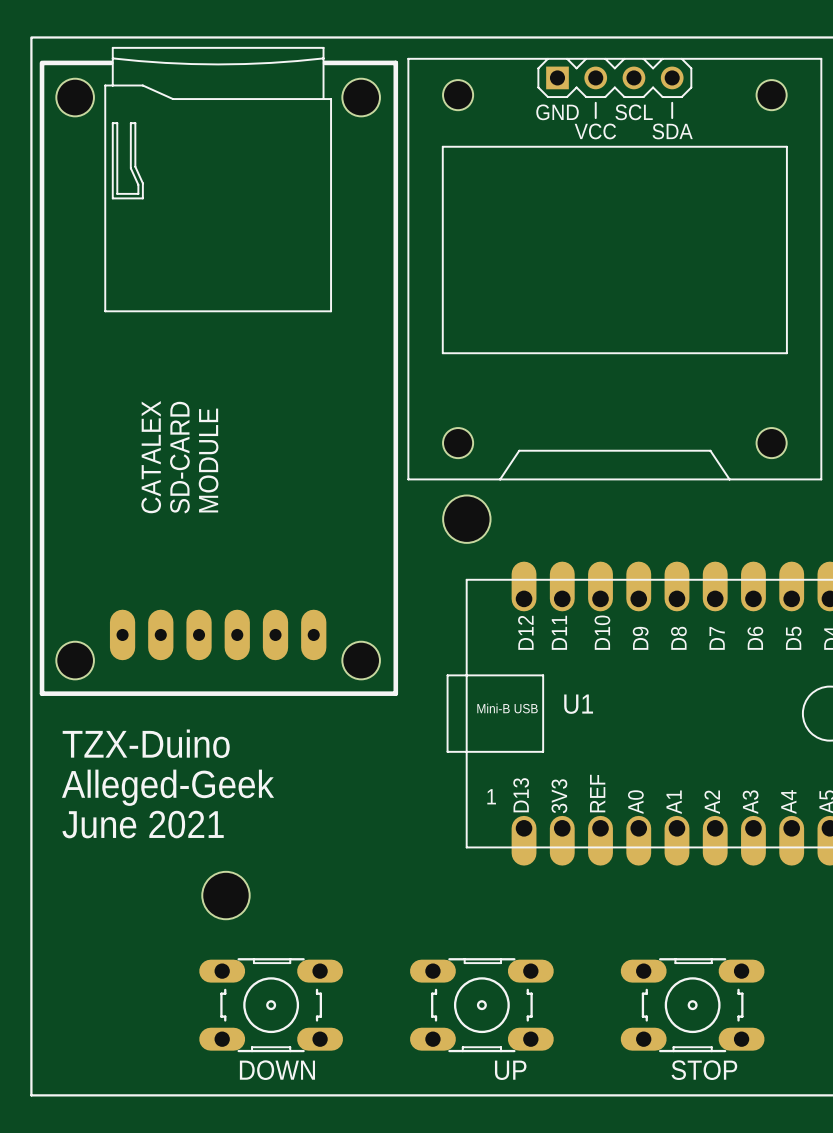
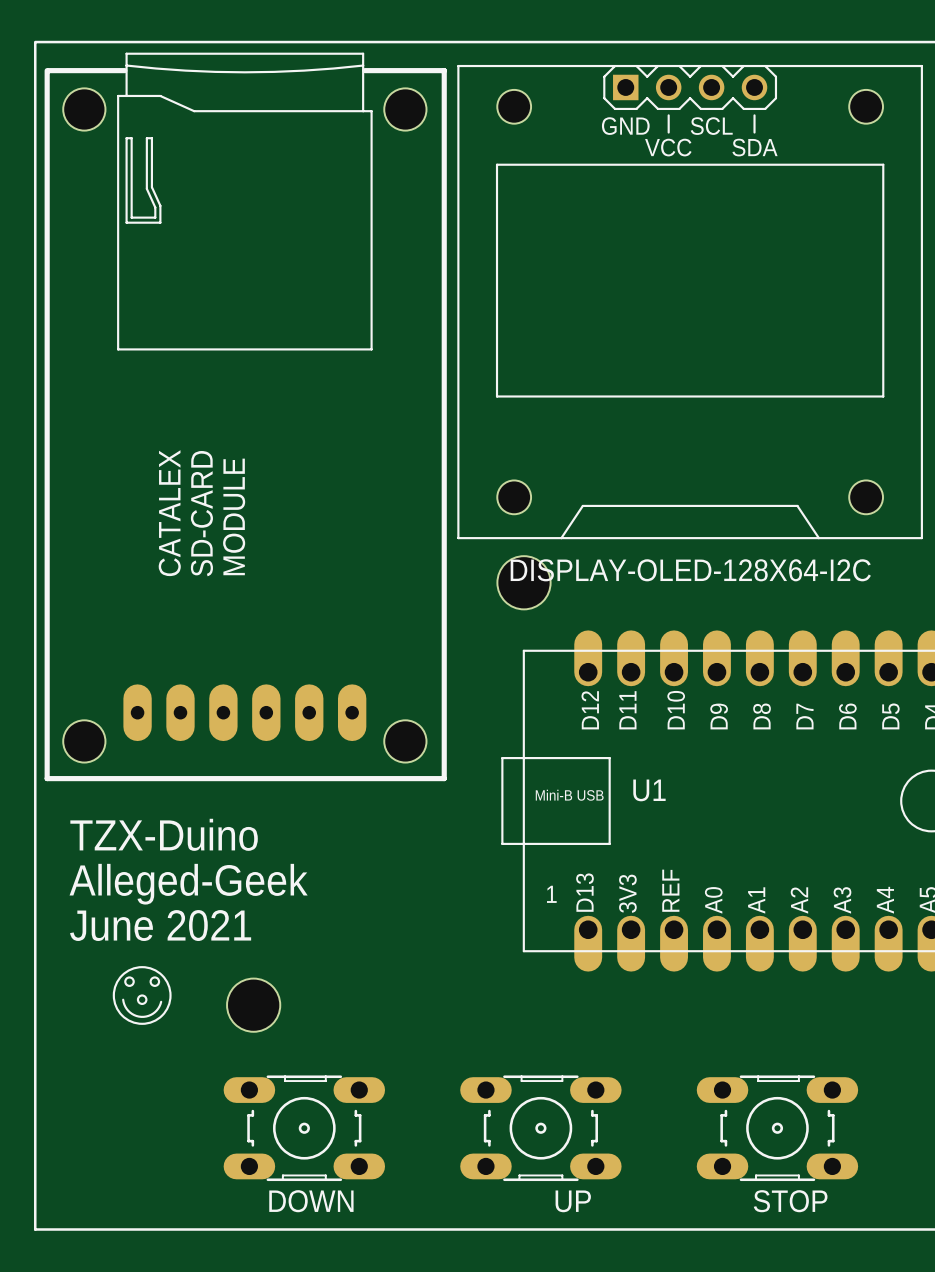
part value: none -> DISPLAY-OLED-128X64-I2C (690, 570)
drawing: none -> [112, 966, 172, 1025]
line: none -> (123, 999) (129, 1012) (141, 1016) (152, 1013) (161, 1001)

